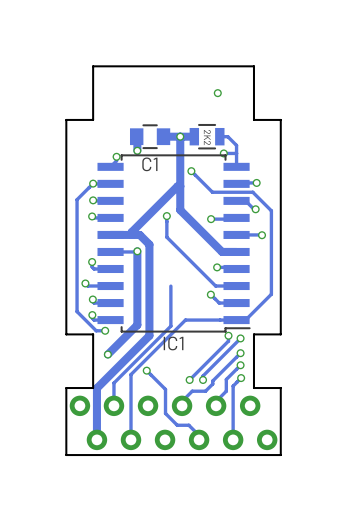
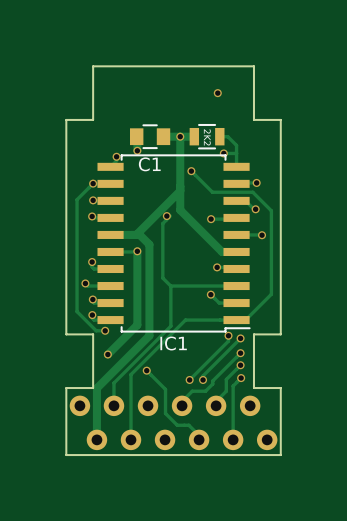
track: (180, 186) (177, 186) (131, 232) (131, 234) -> none
track: none -> (180, 190) (136, 234)
track: (166, 216) (166, 237) (215, 286) -> (170, 216) (162, 223) (162, 278) (170, 286) (215, 286)

